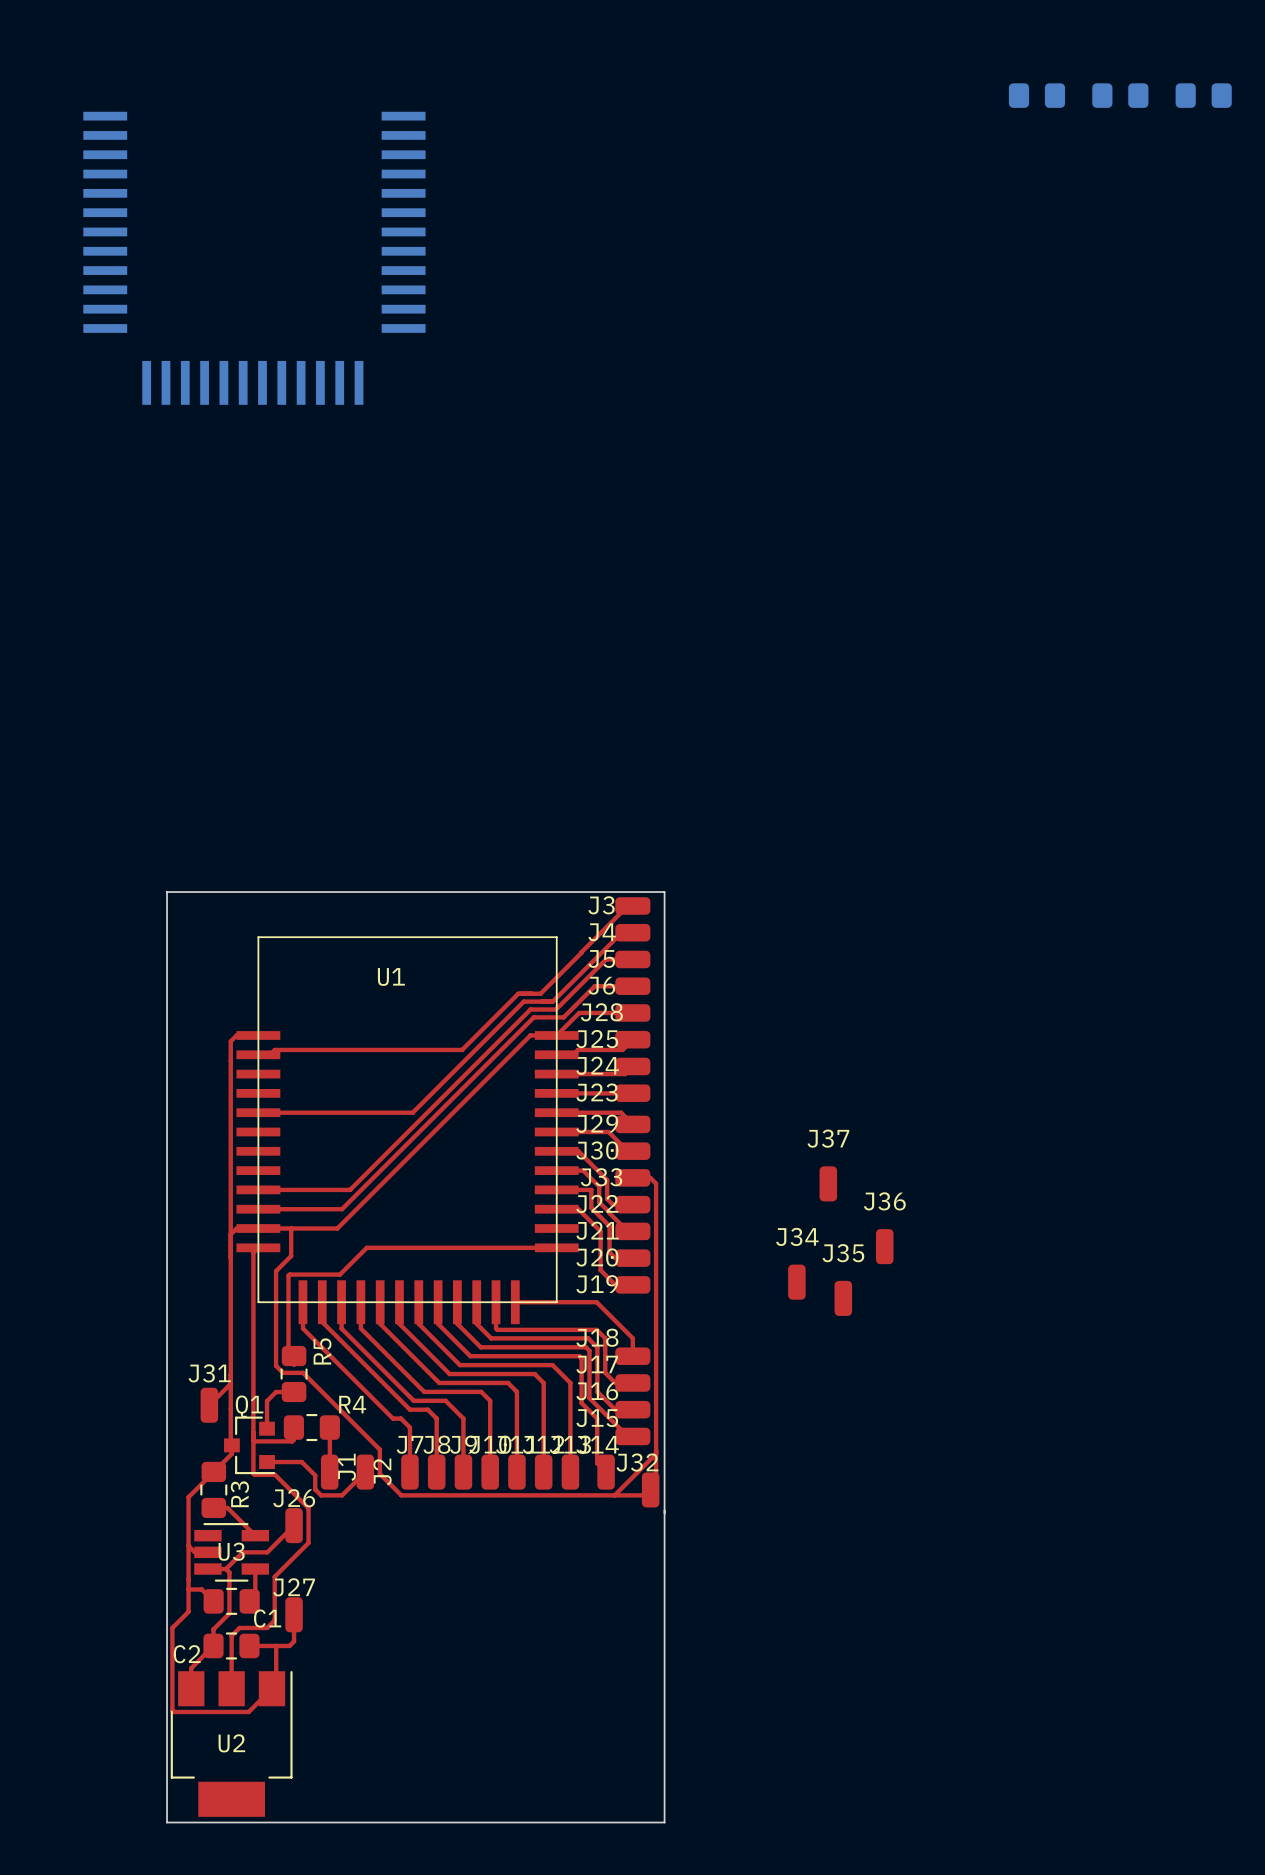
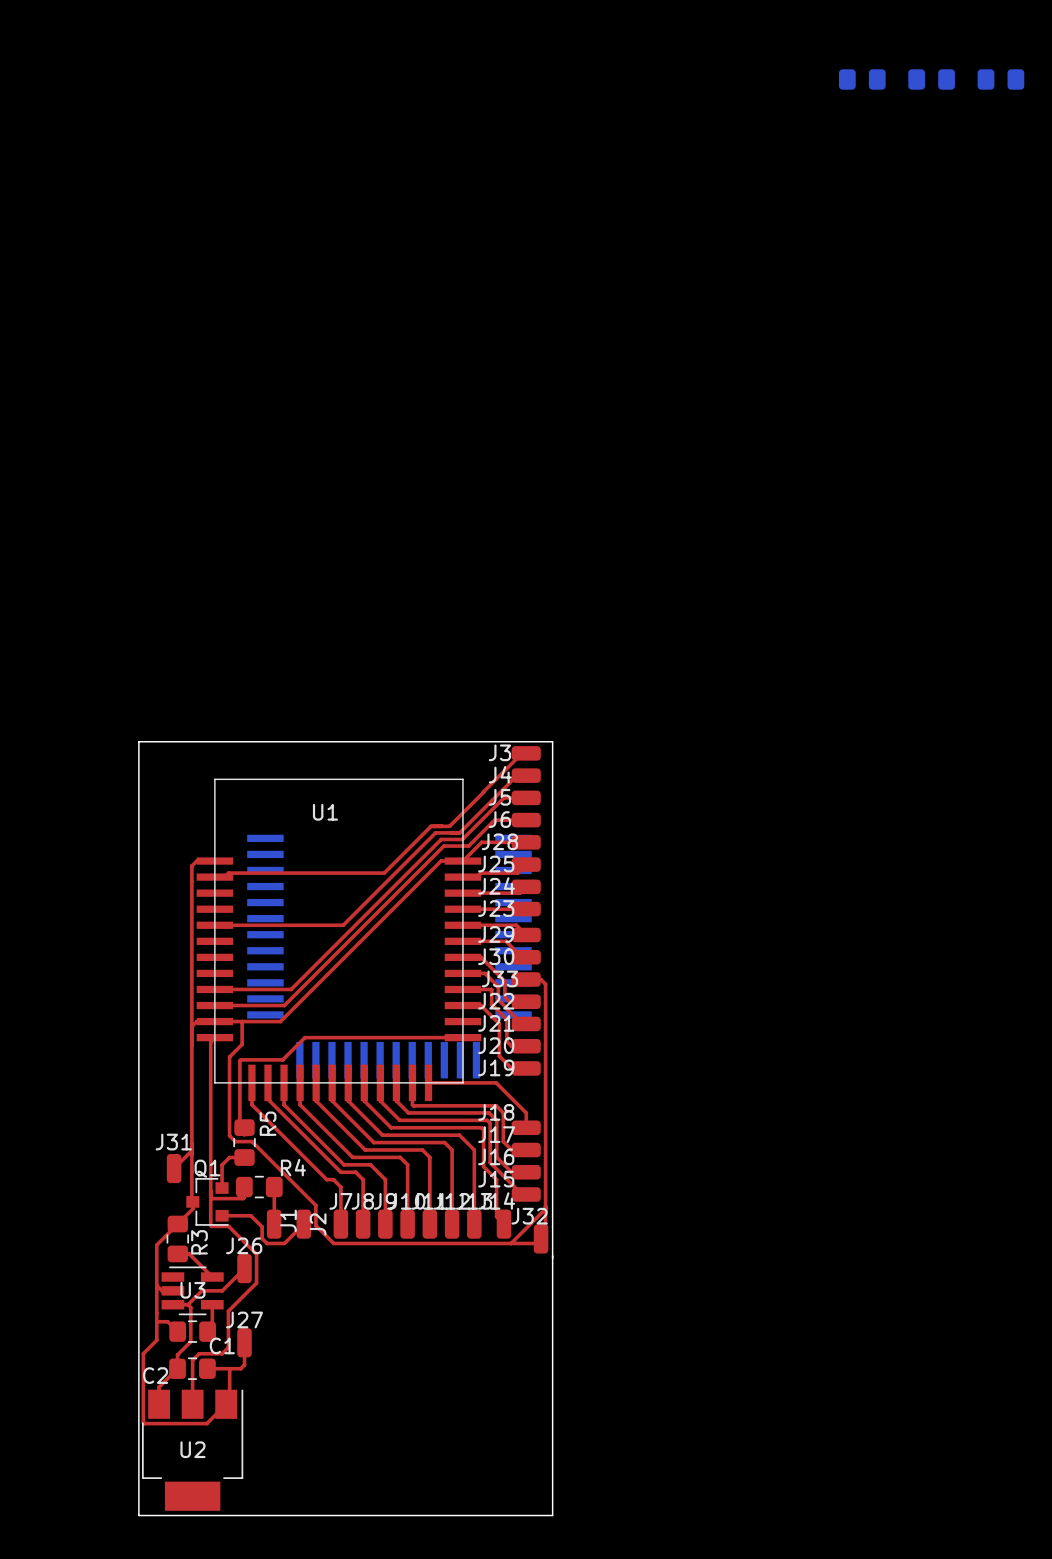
part: (254, 258) -> none
part: none -> (389, 956)
J37: (828, 1183) -> none
J36: (884, 1246) -> none
J34: (796, 1282) -> none
J35: (843, 1298) -> none

